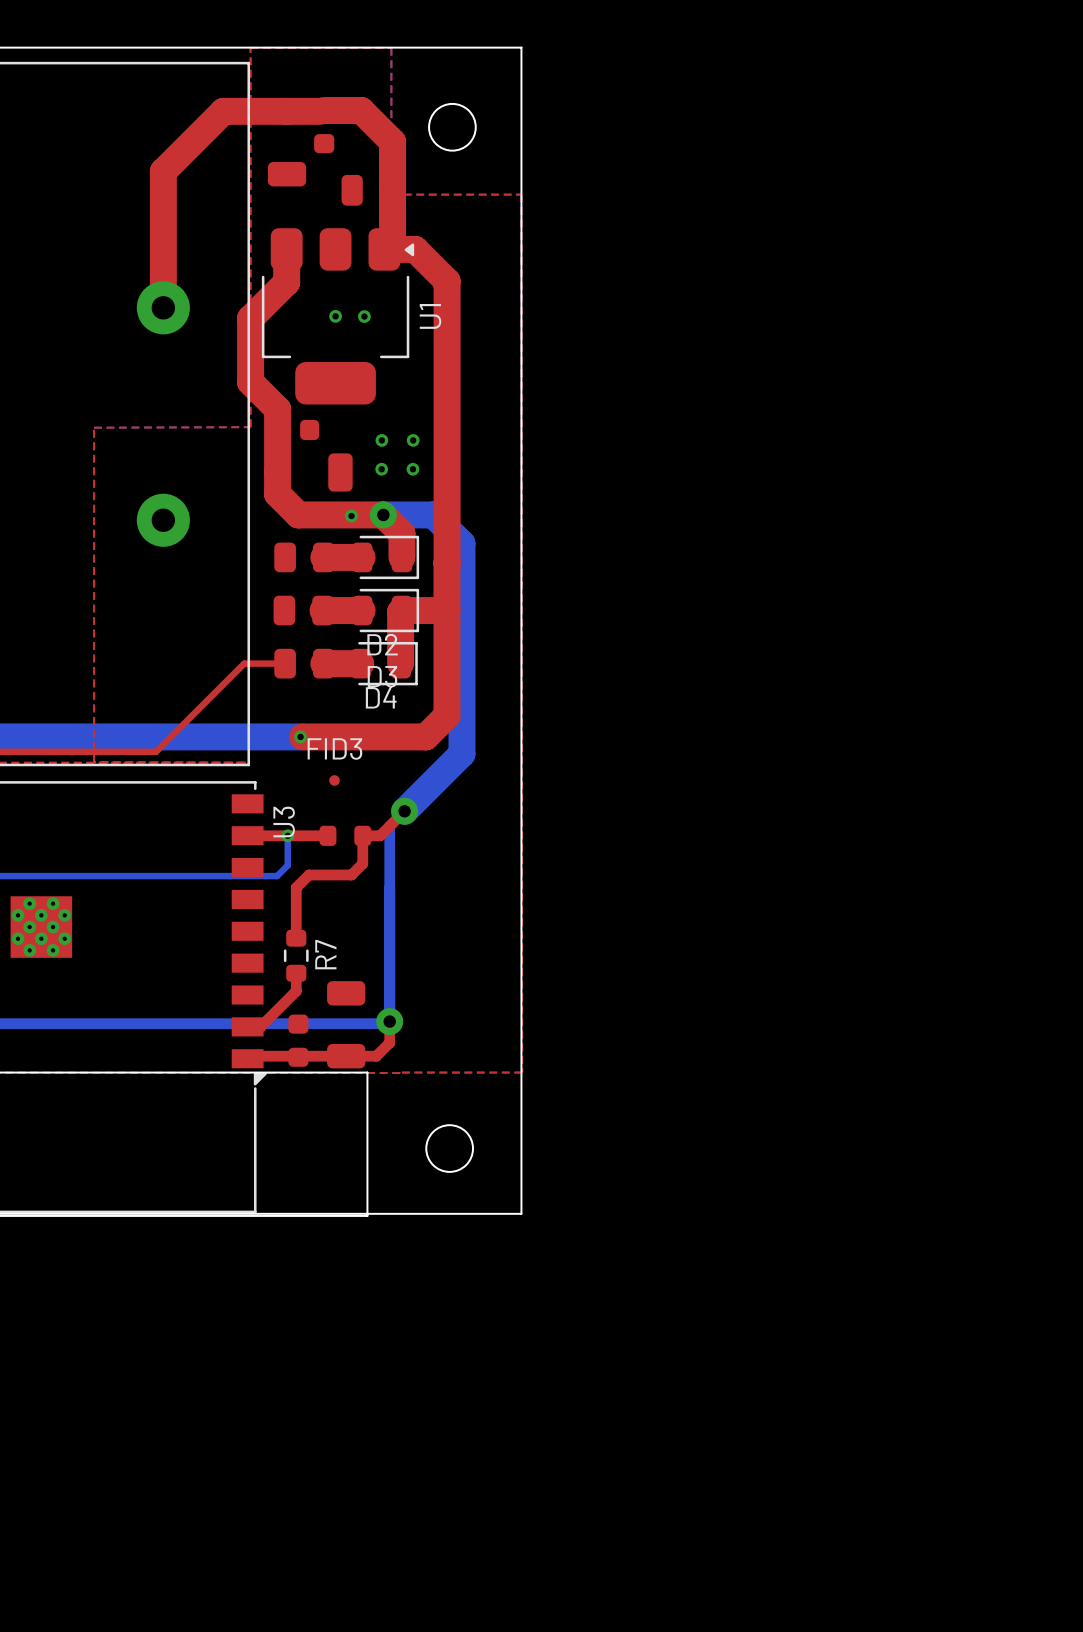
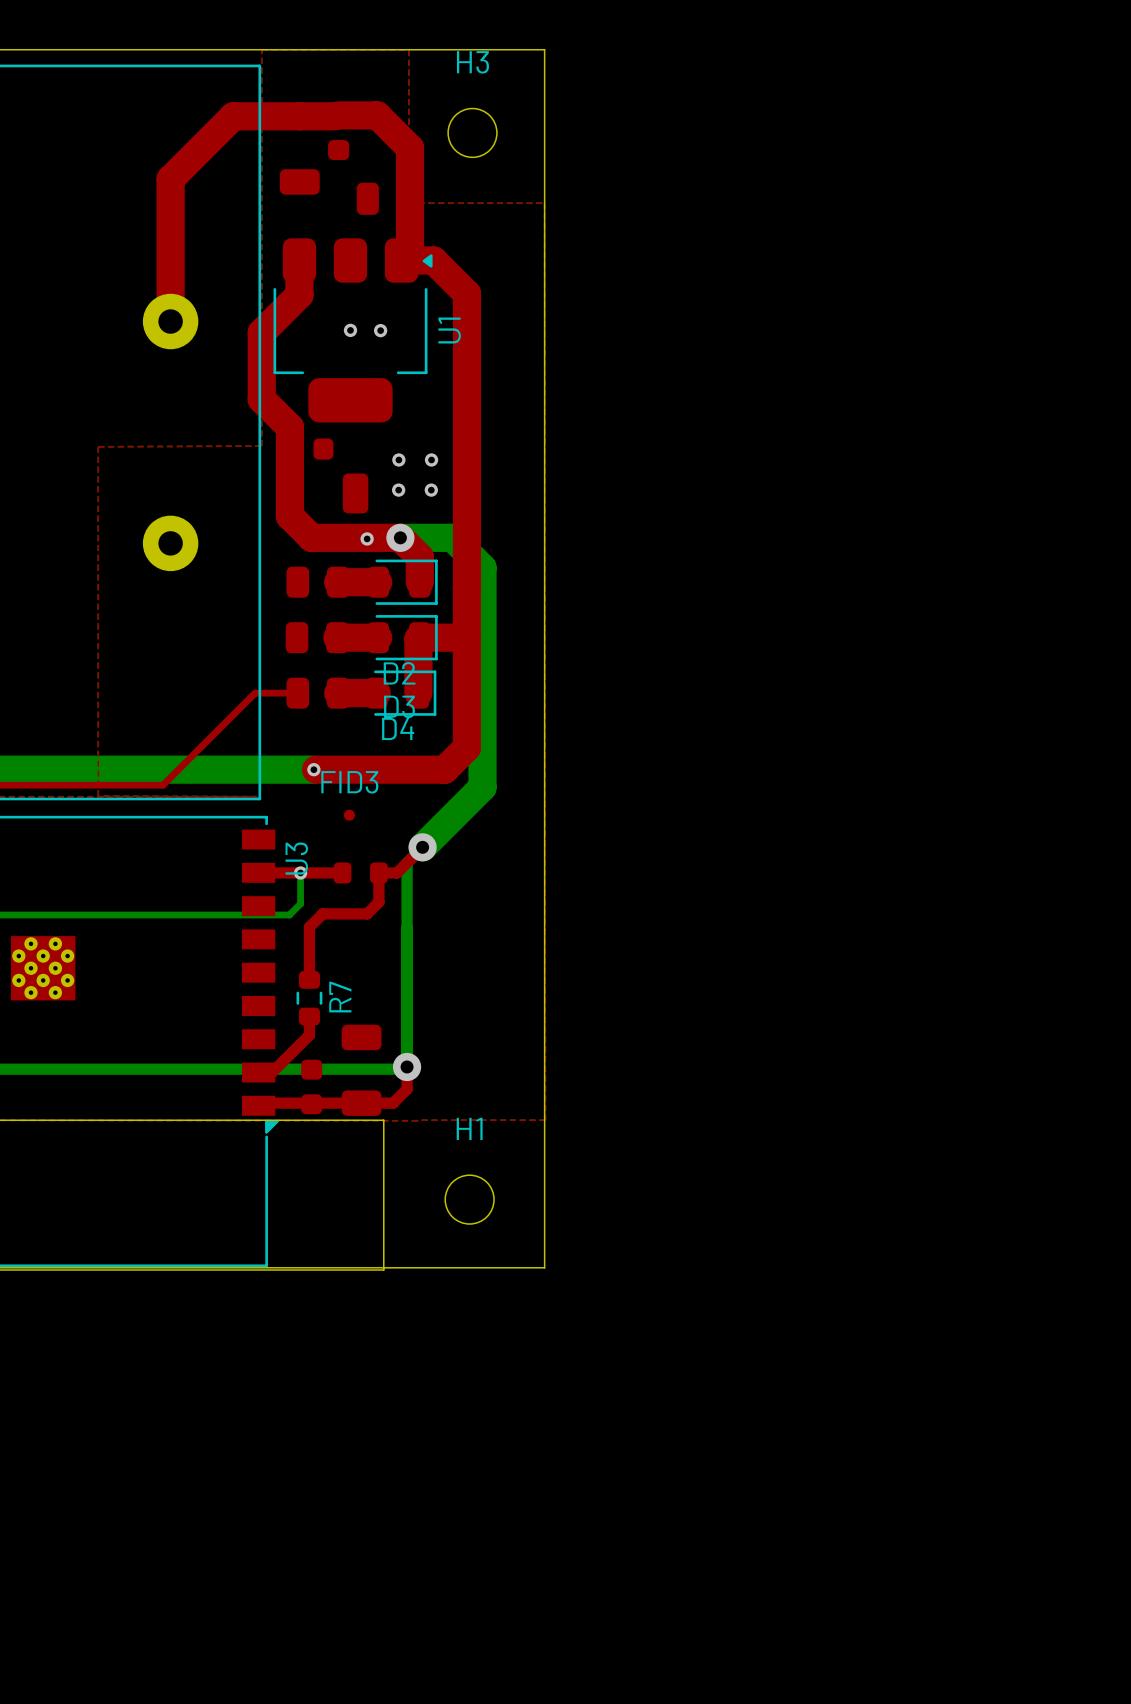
H3 name: none -> H3 (472, 62)
H1 name: none -> H1 (469, 1128)

